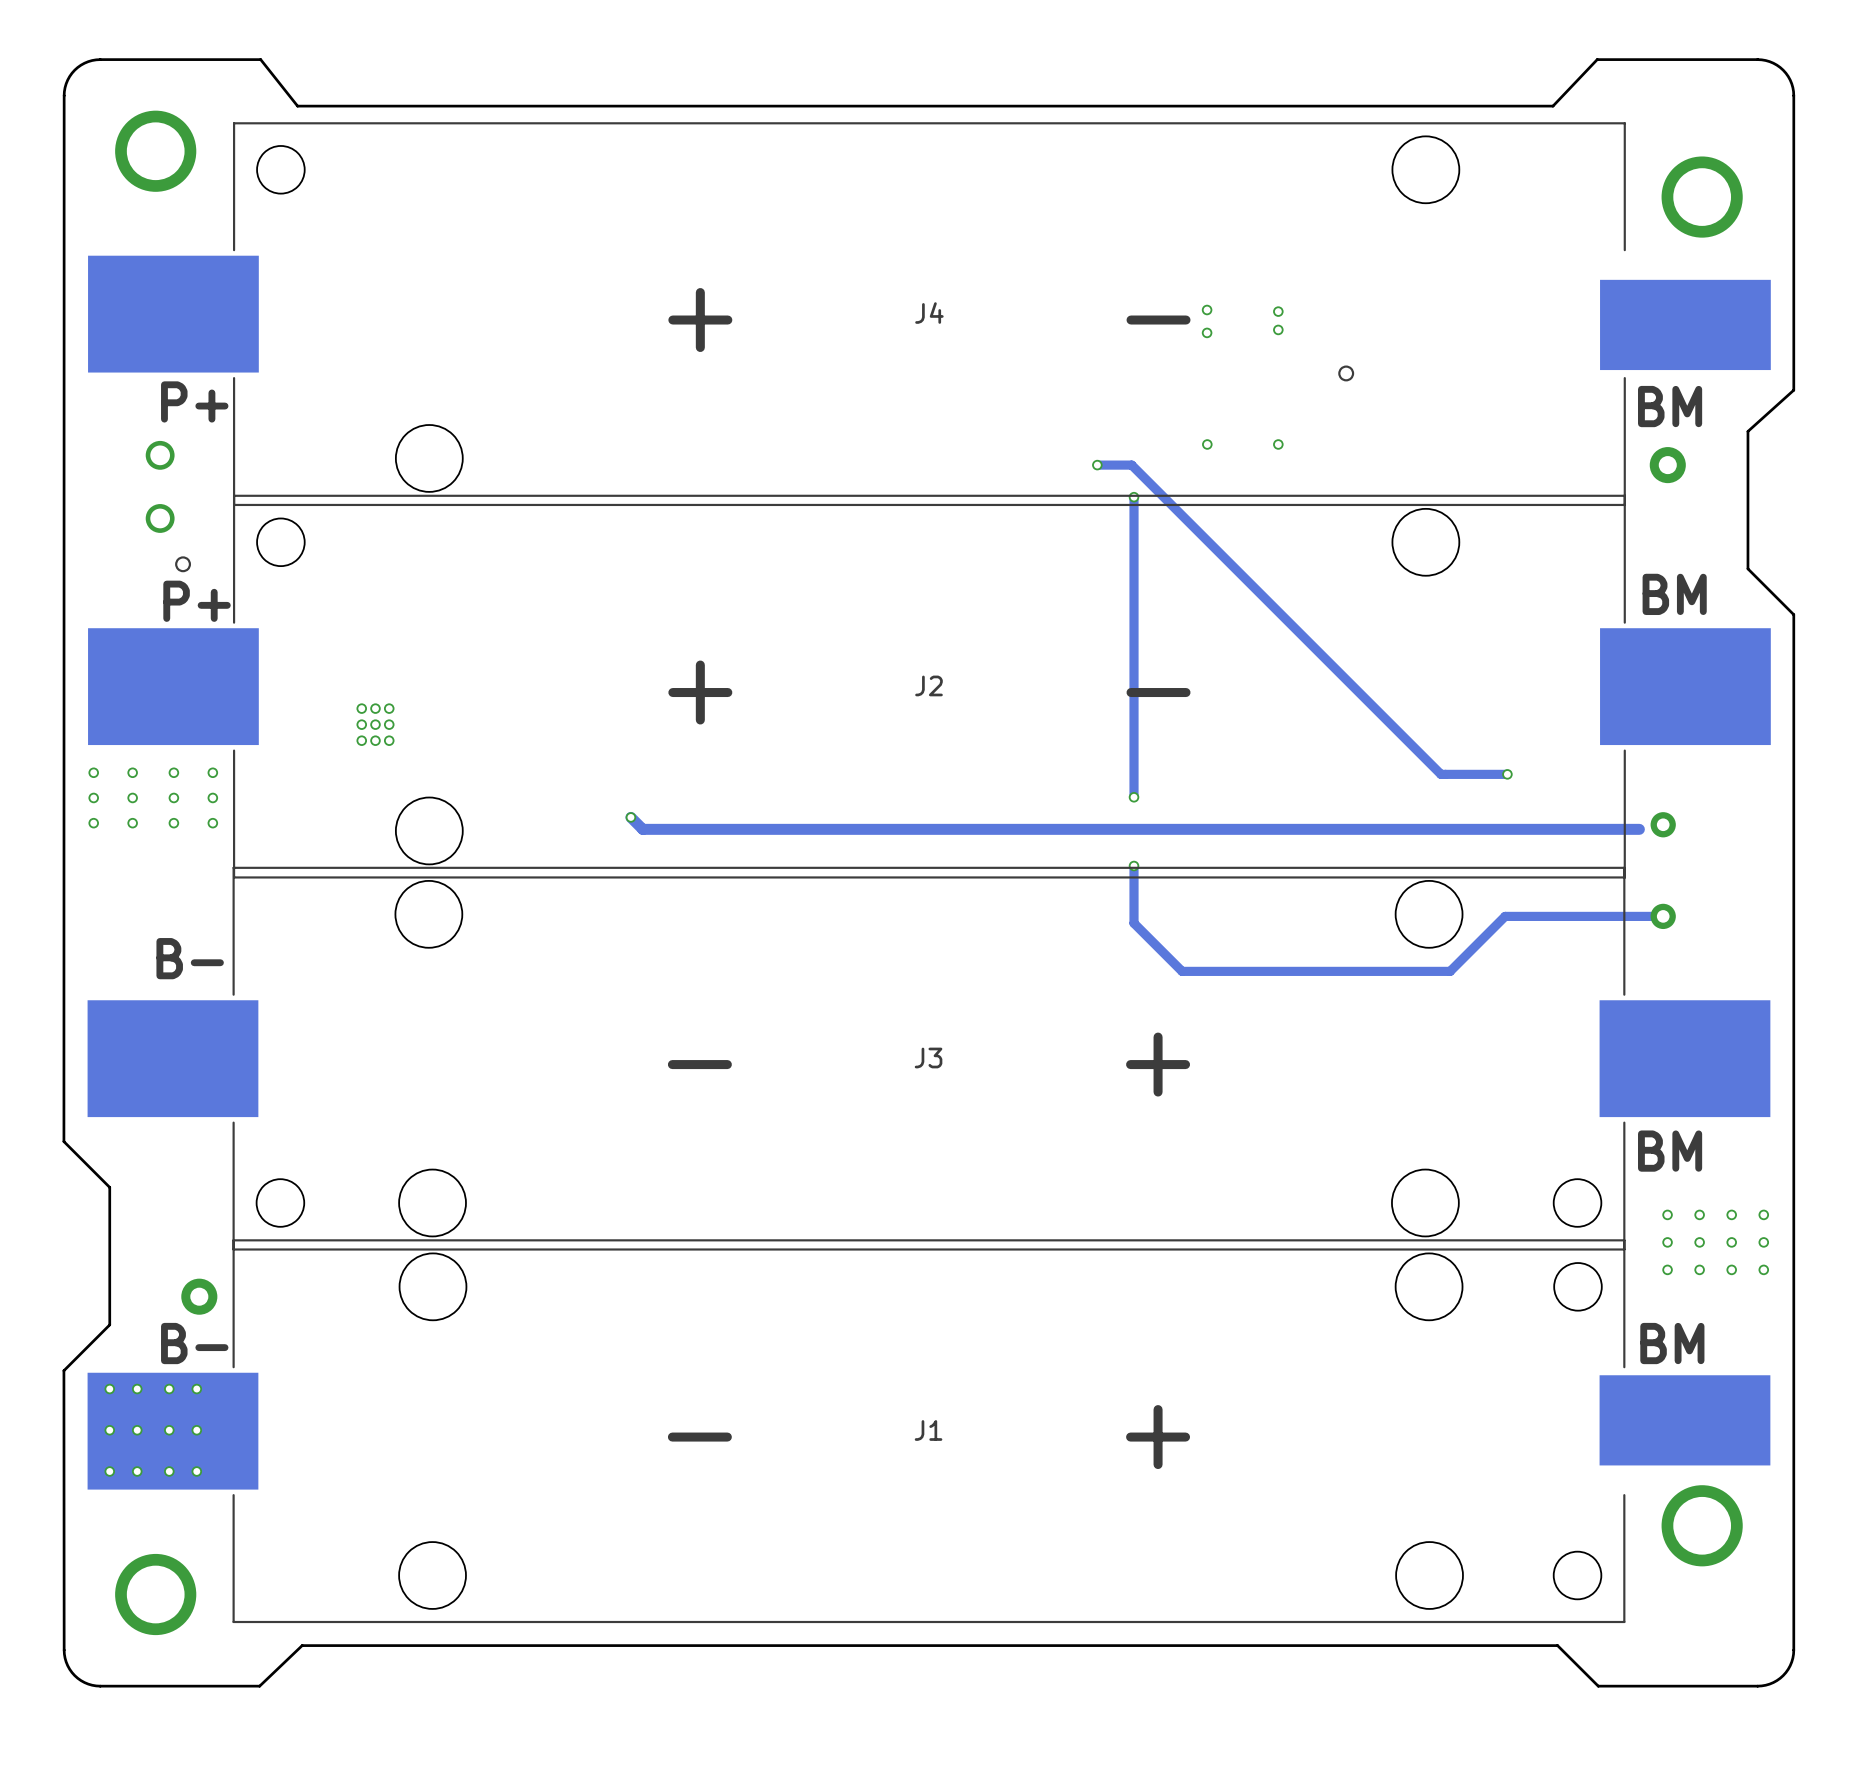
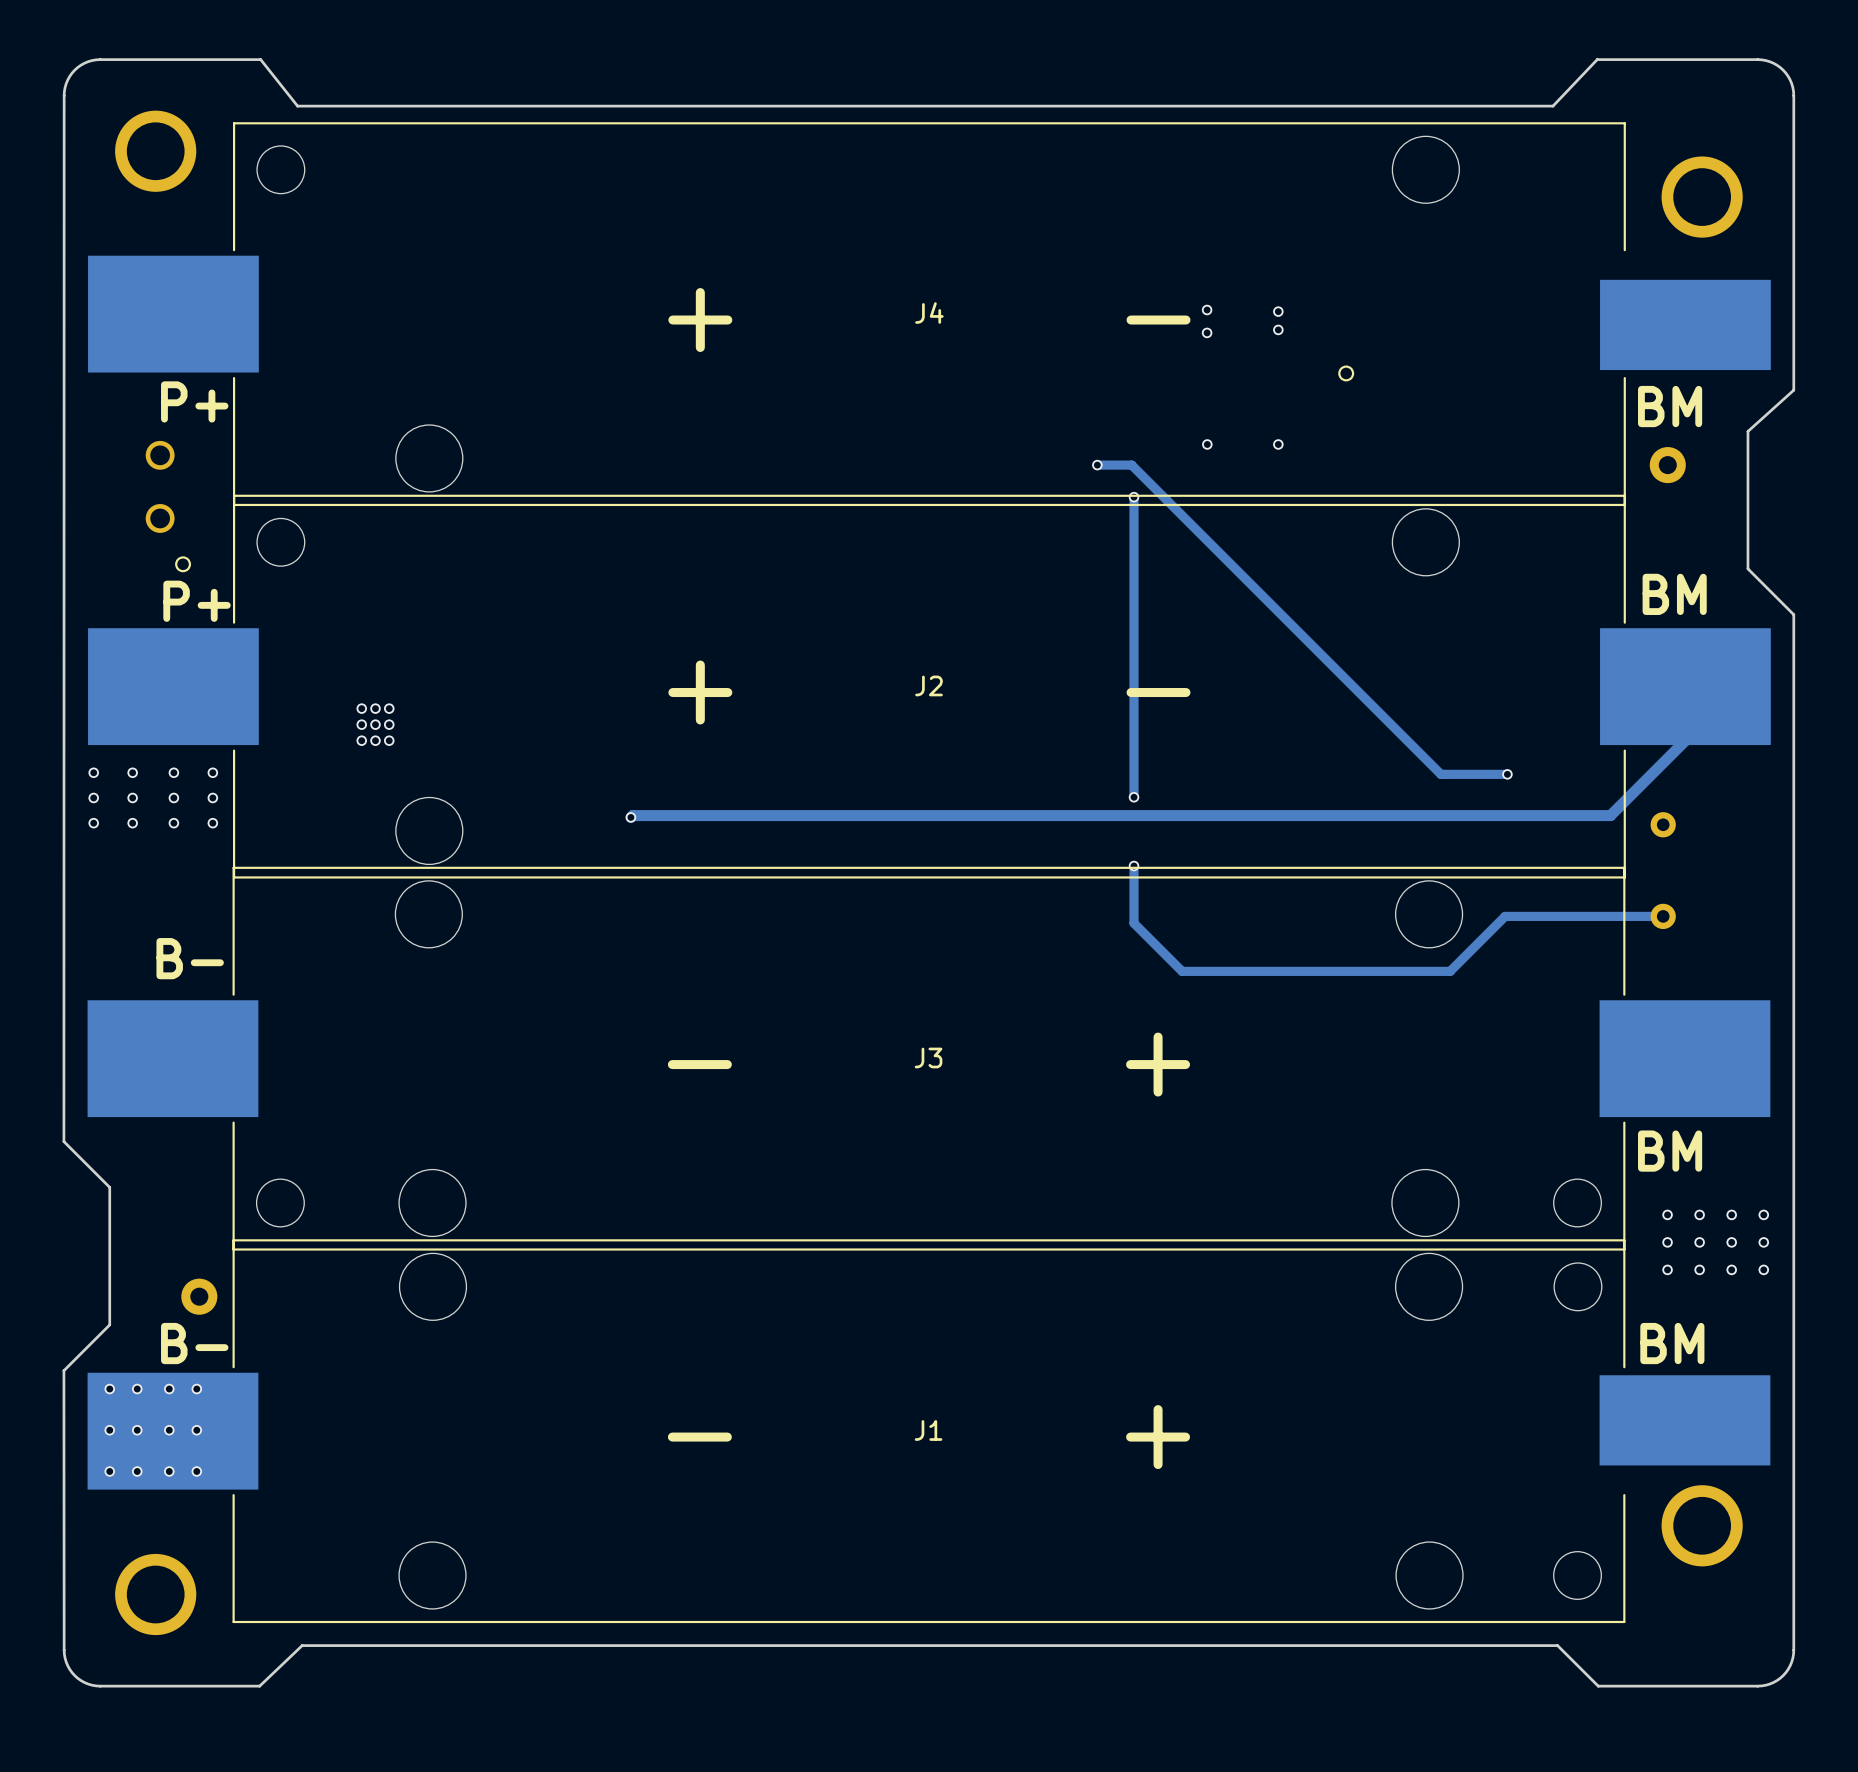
track: (630, 817) (642, 829) (1639, 829) -> (630, 817) (632, 815) (1610, 815) (1685, 740) (1685, 686)

